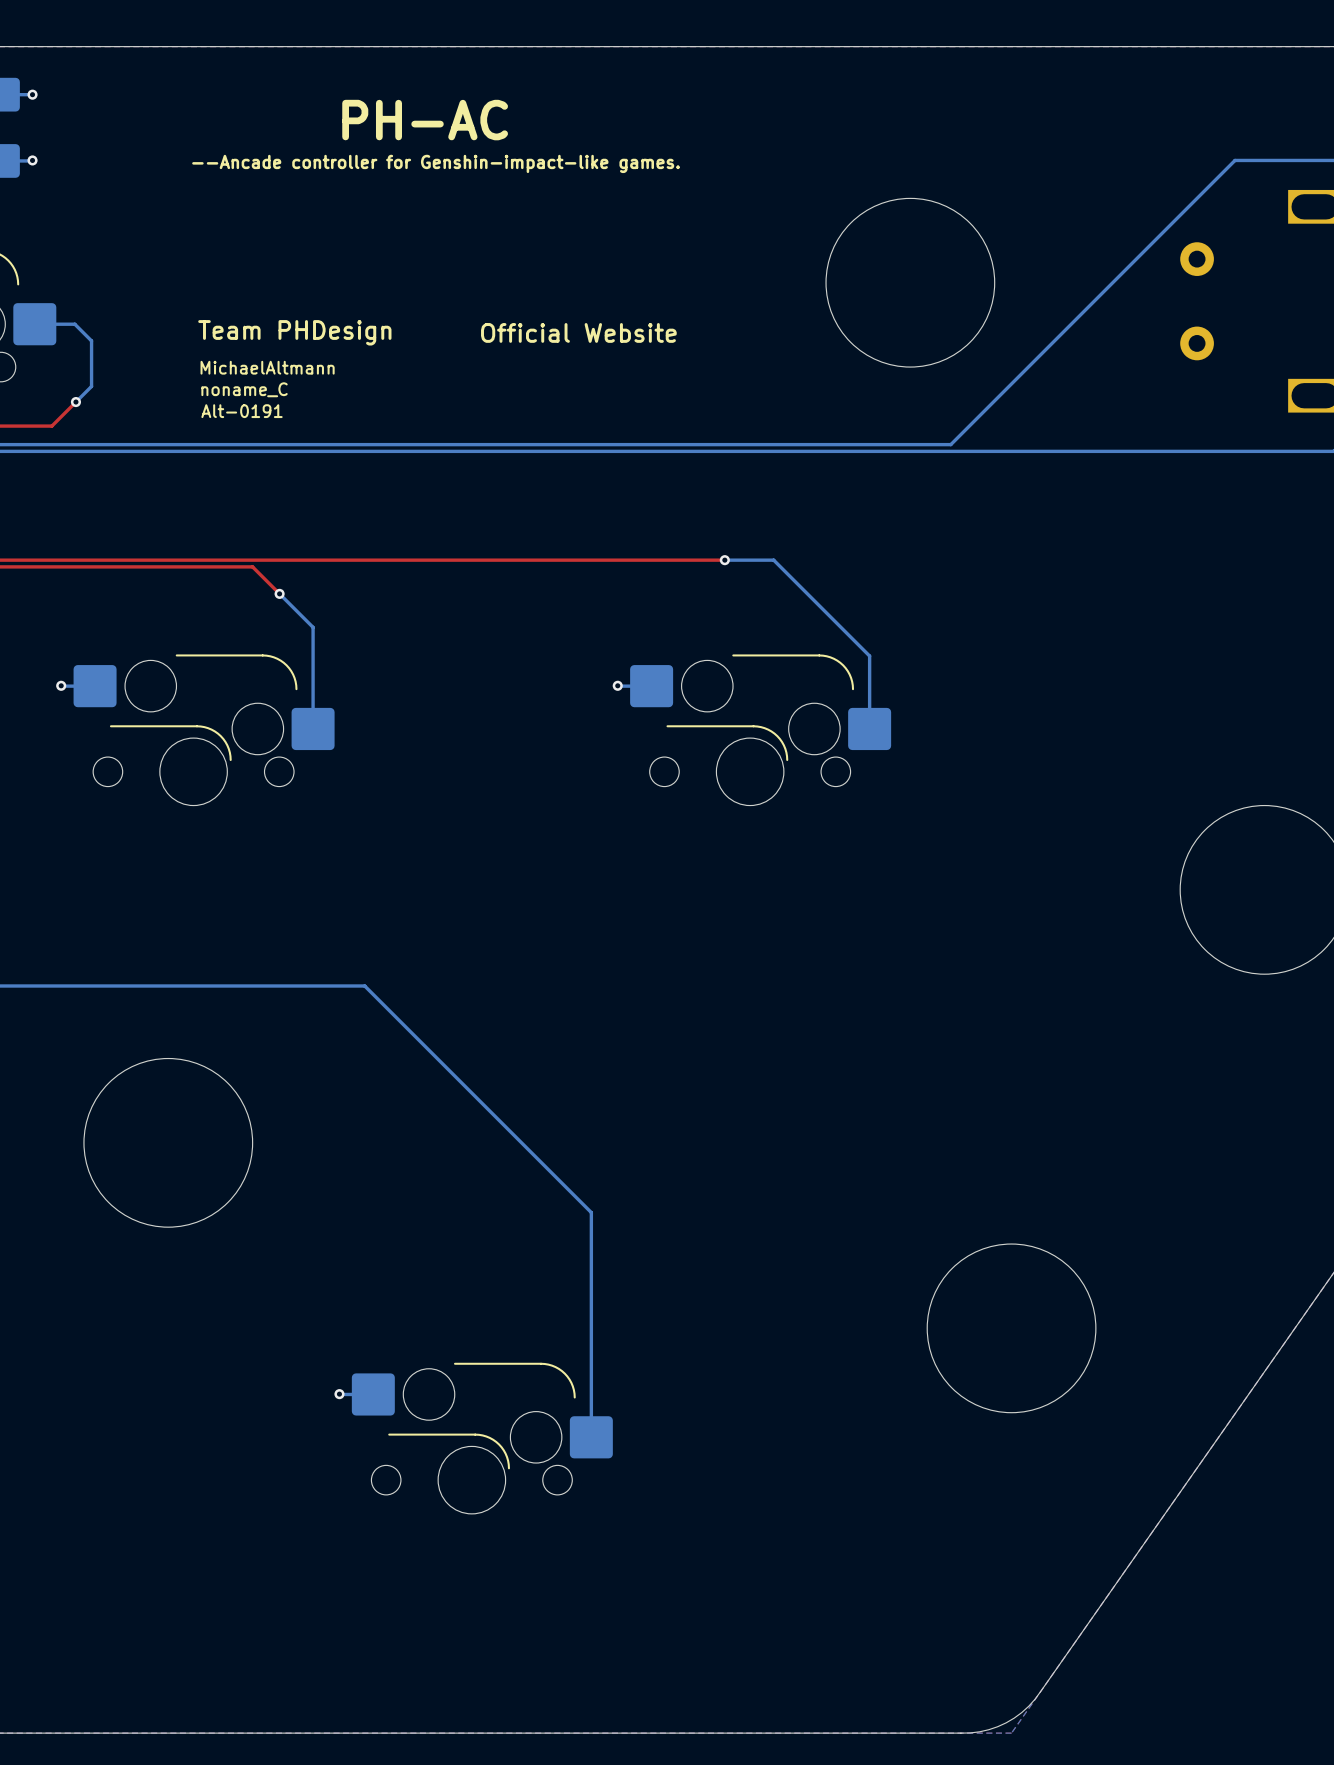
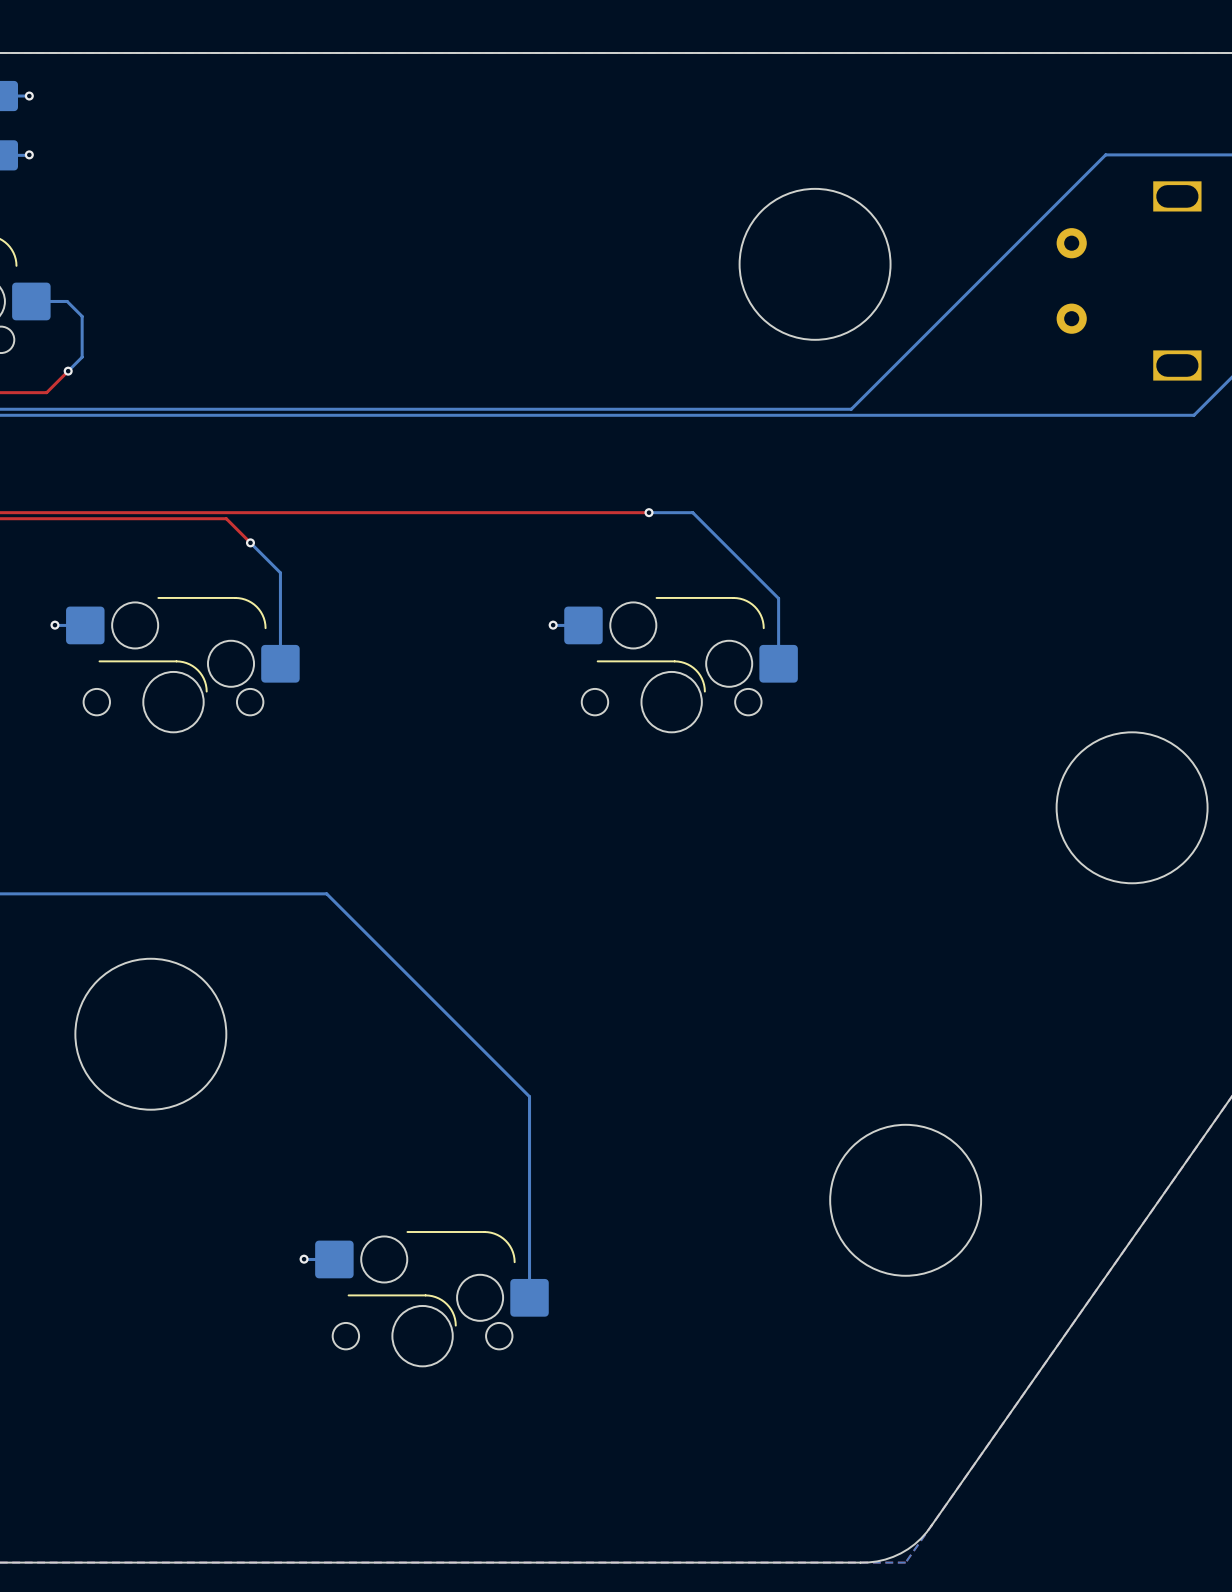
text: PH-AC (425, 120) -> none
text: --Ancade controller for Genshin-impact-like games. (436, 163) -> none
text: Team PHDesign (294, 332) -> none
text: Official Website (578, 332) -> none
text: MichaelAltmann (267, 367) -> none
text: noname_C (244, 389) -> none
text: Alt-0191 (242, 411) -> none

